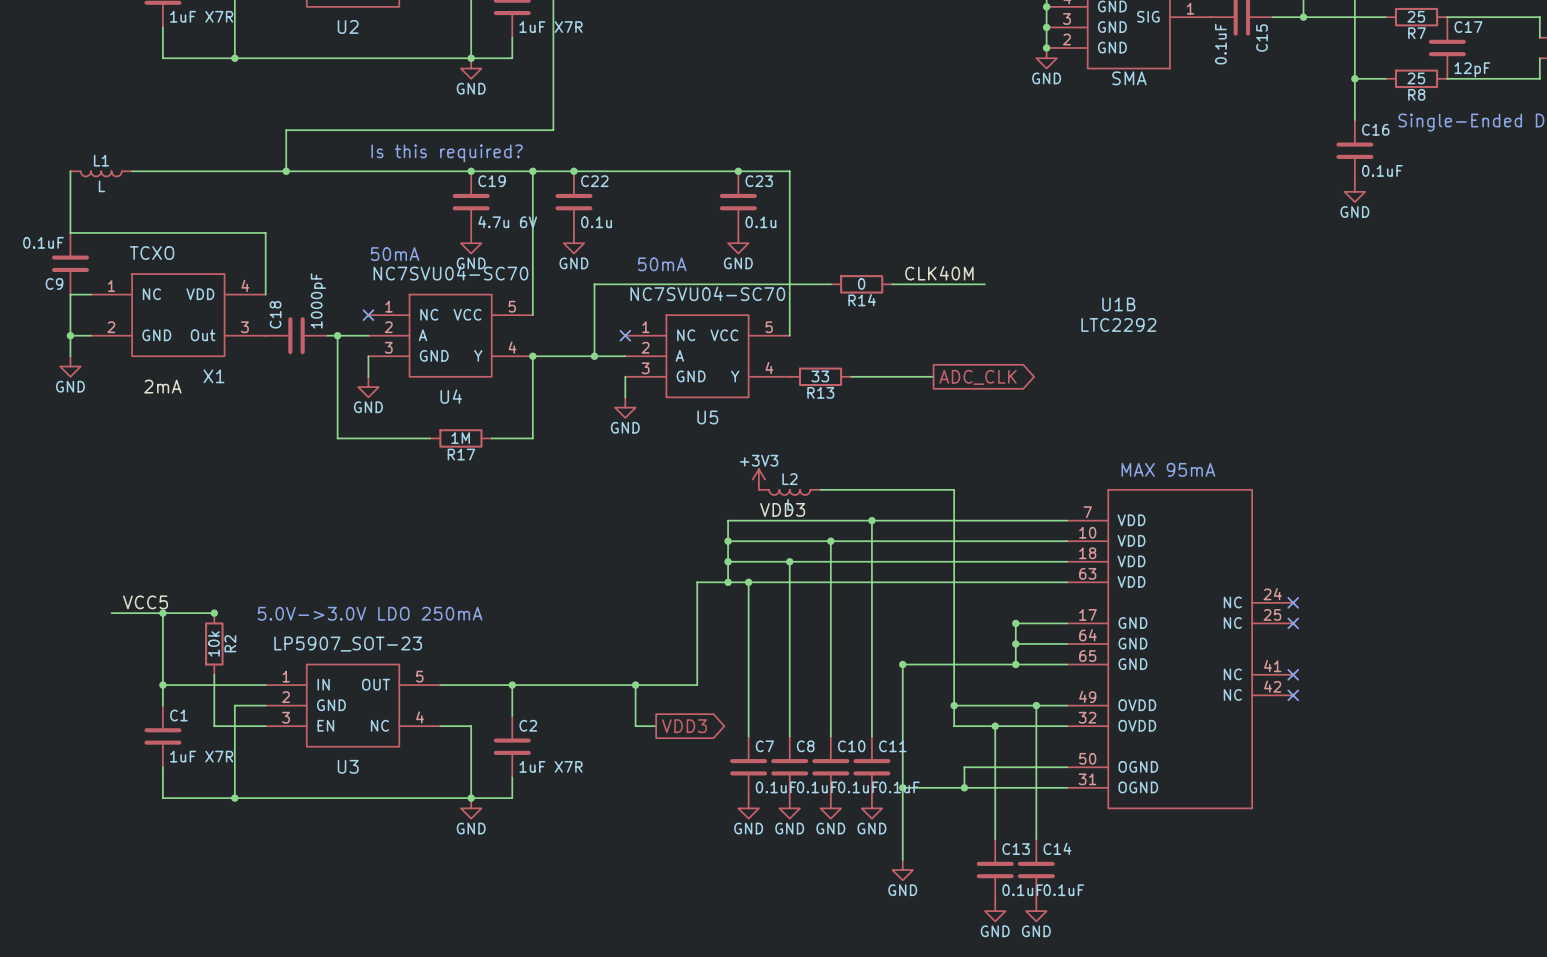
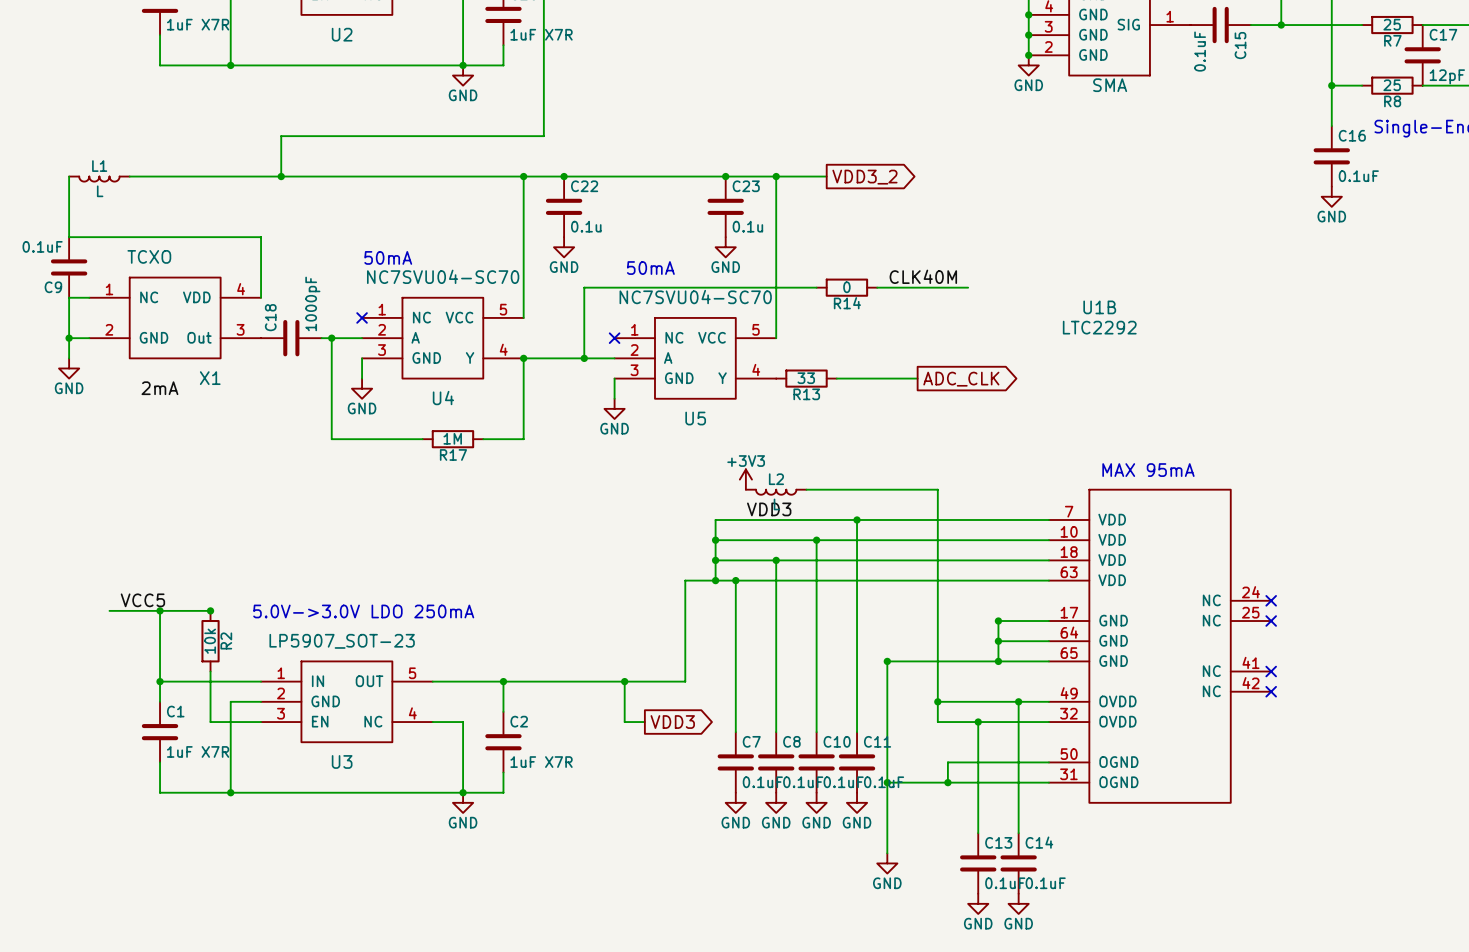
text: Is this required? (447, 153) -> none
junction: (471, 171) -> none
wire: none -> (776, 176) (826, 176)
junction: none -> (776, 176)
global label: none -> VDD3_2 (864, 177)
C19: 4.7u 6V (471, 202) -> none
power symbol: GND (471, 243) -> none

